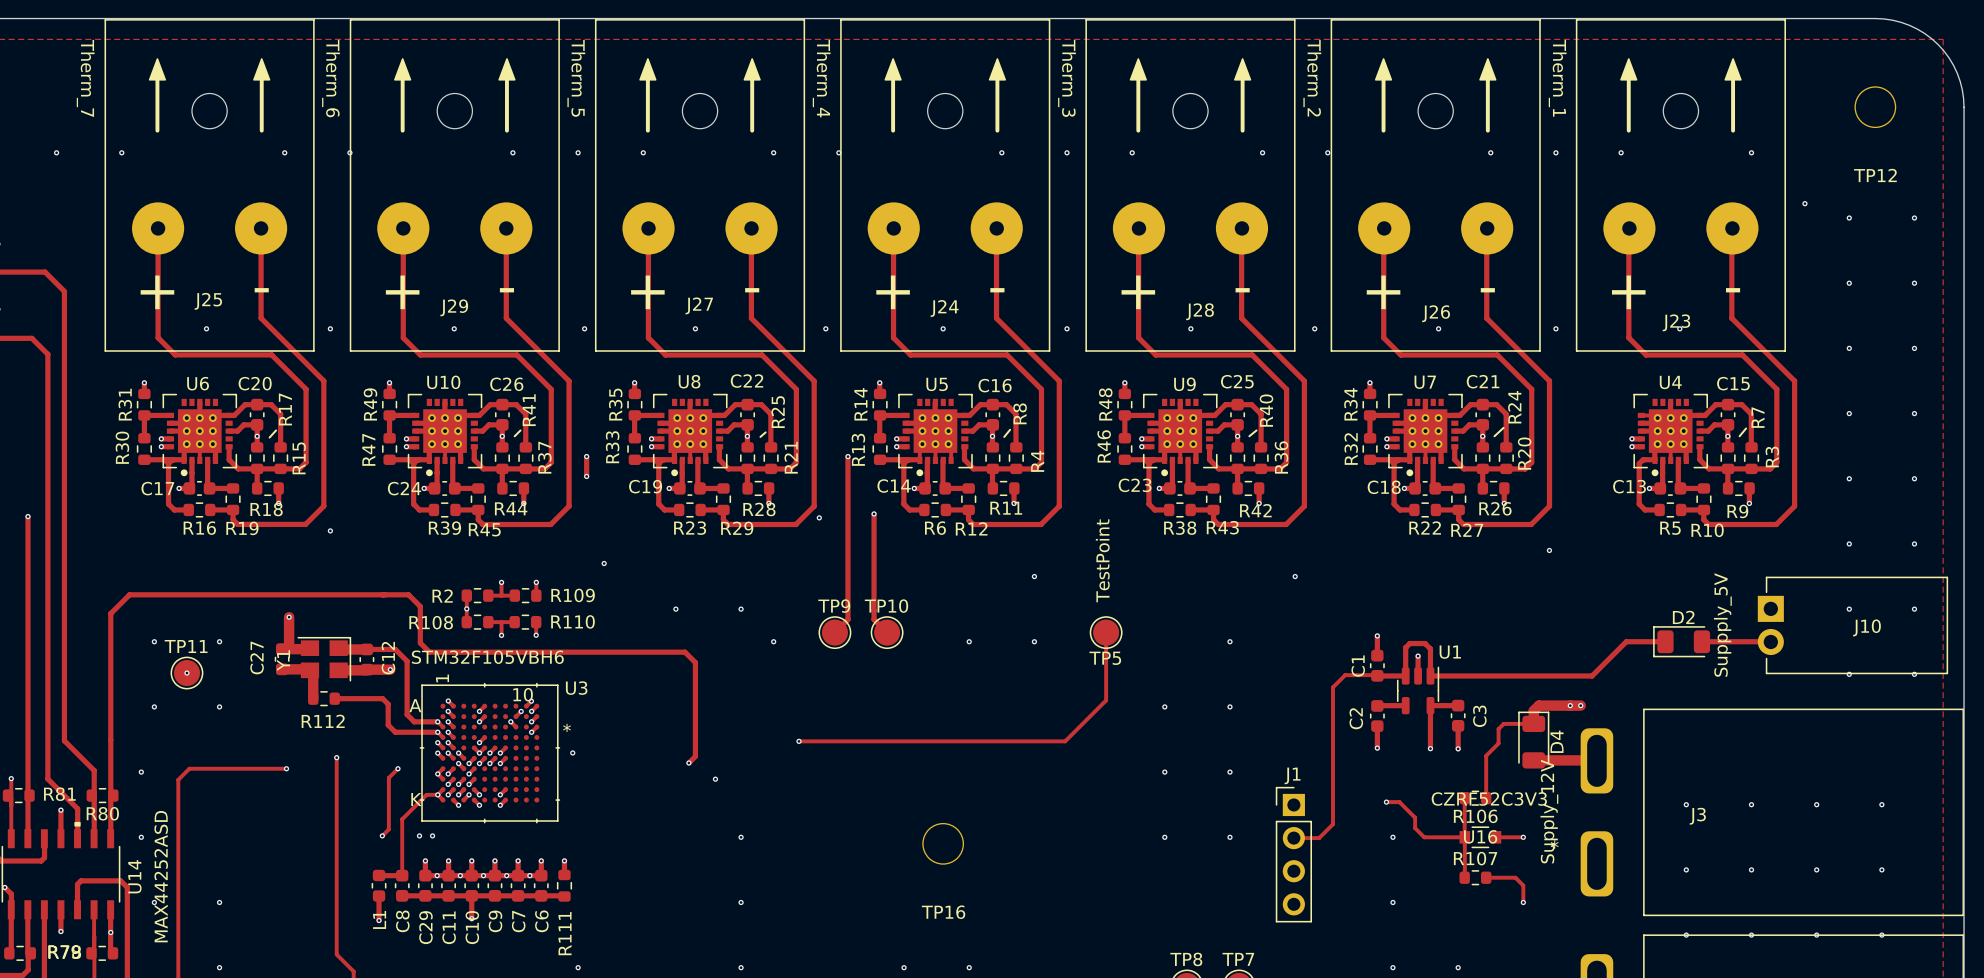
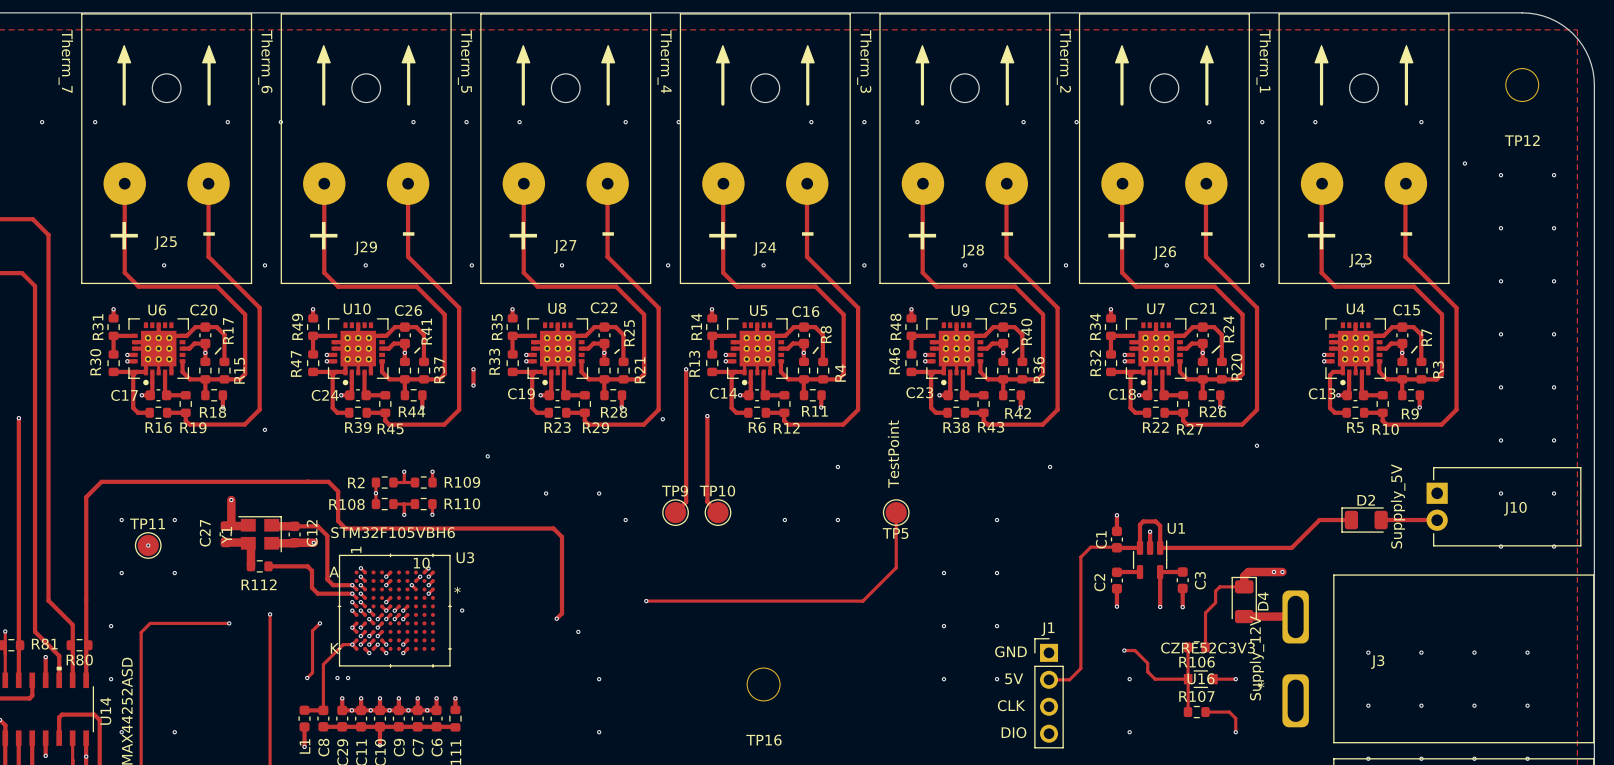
text: none -> GND (1010, 651)
text: none -> 5V (1014, 678)
text: none -> CLK (1011, 705)
text: none -> DIO (1013, 732)

